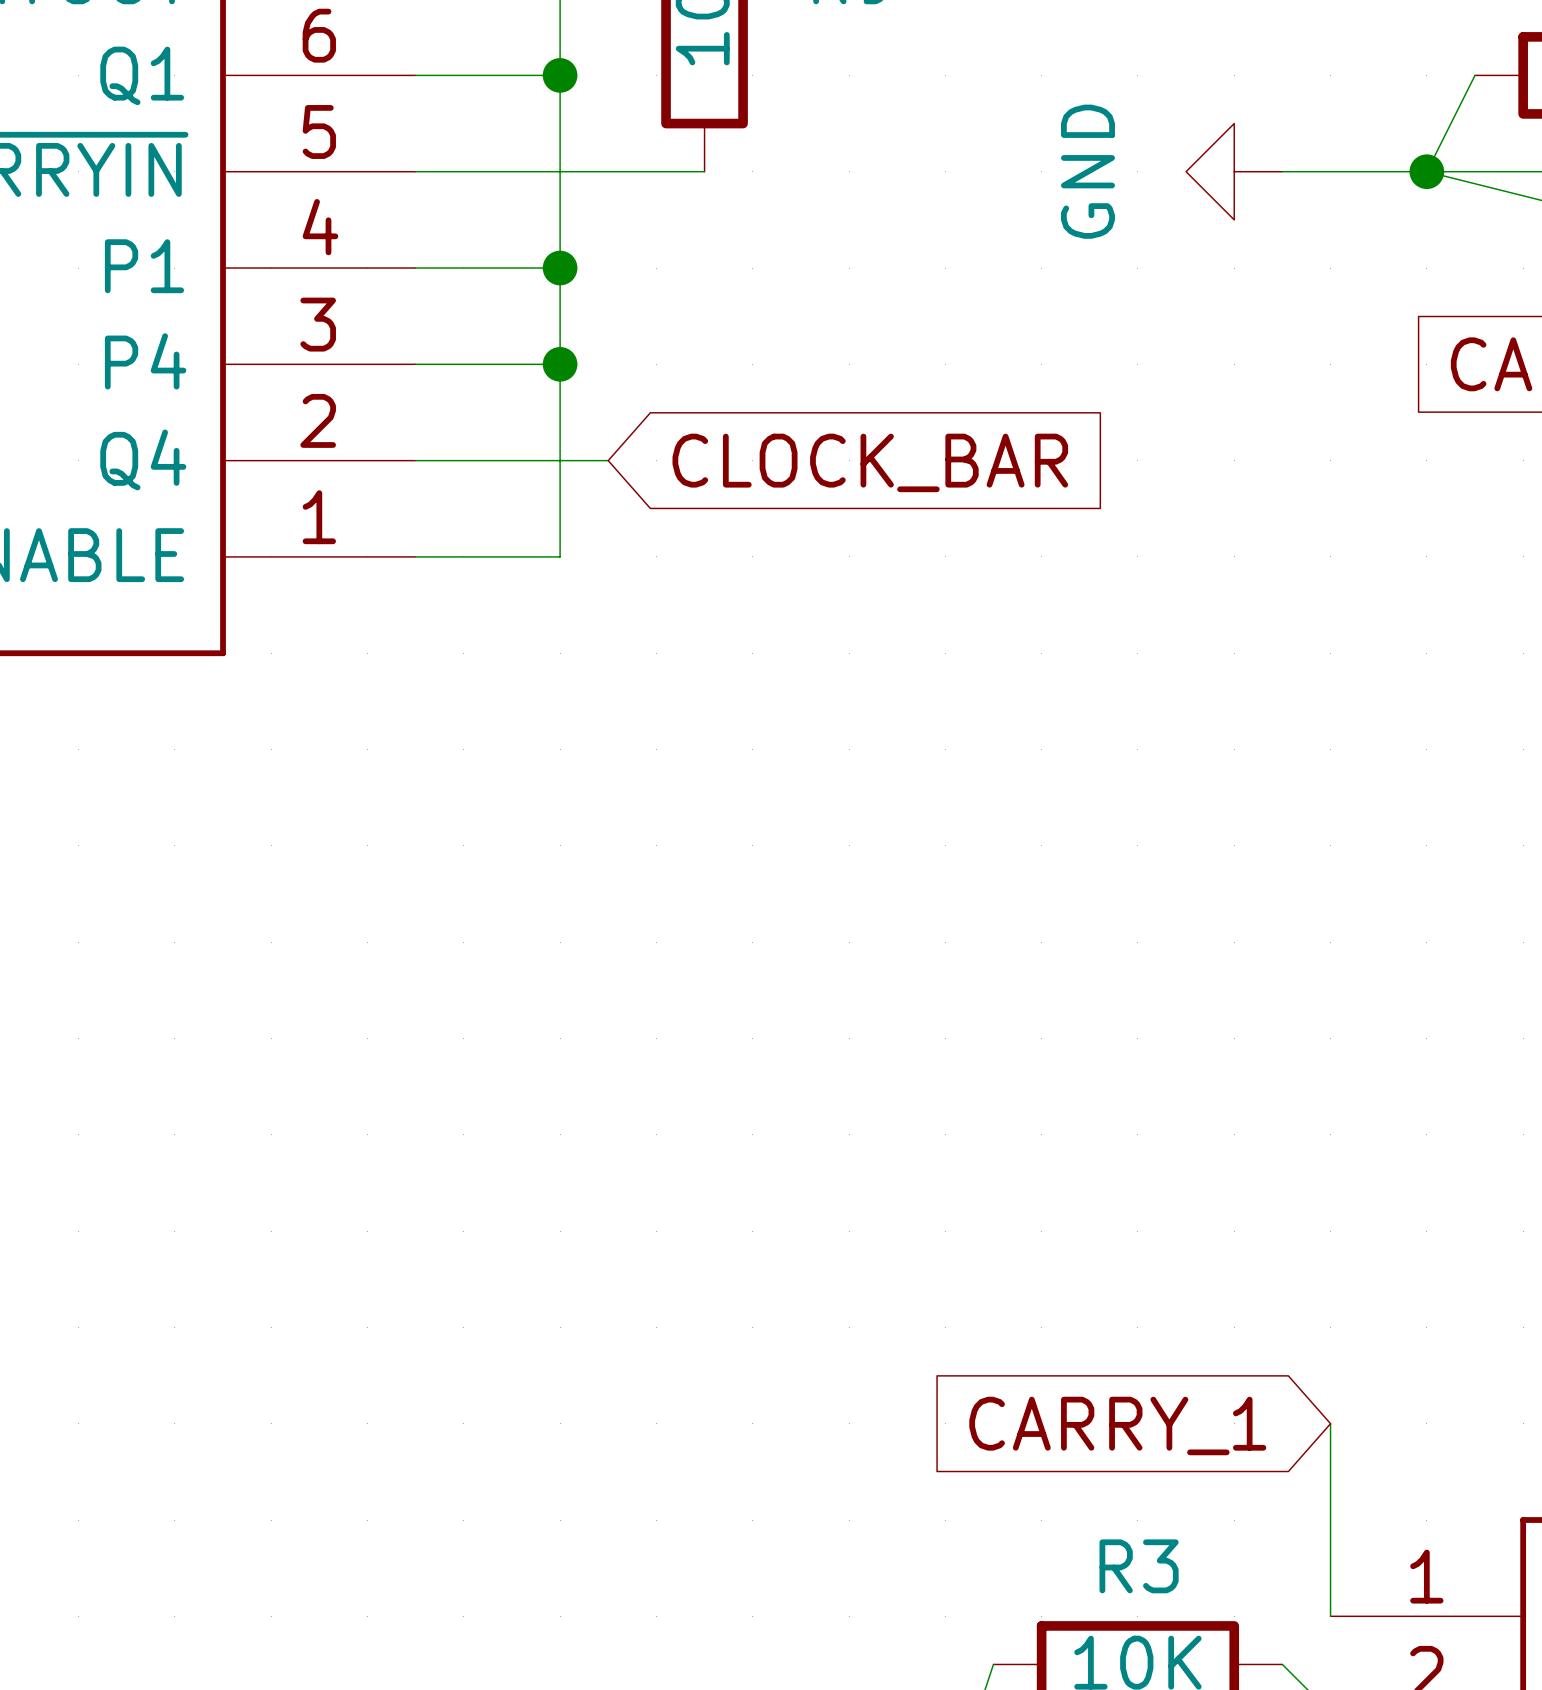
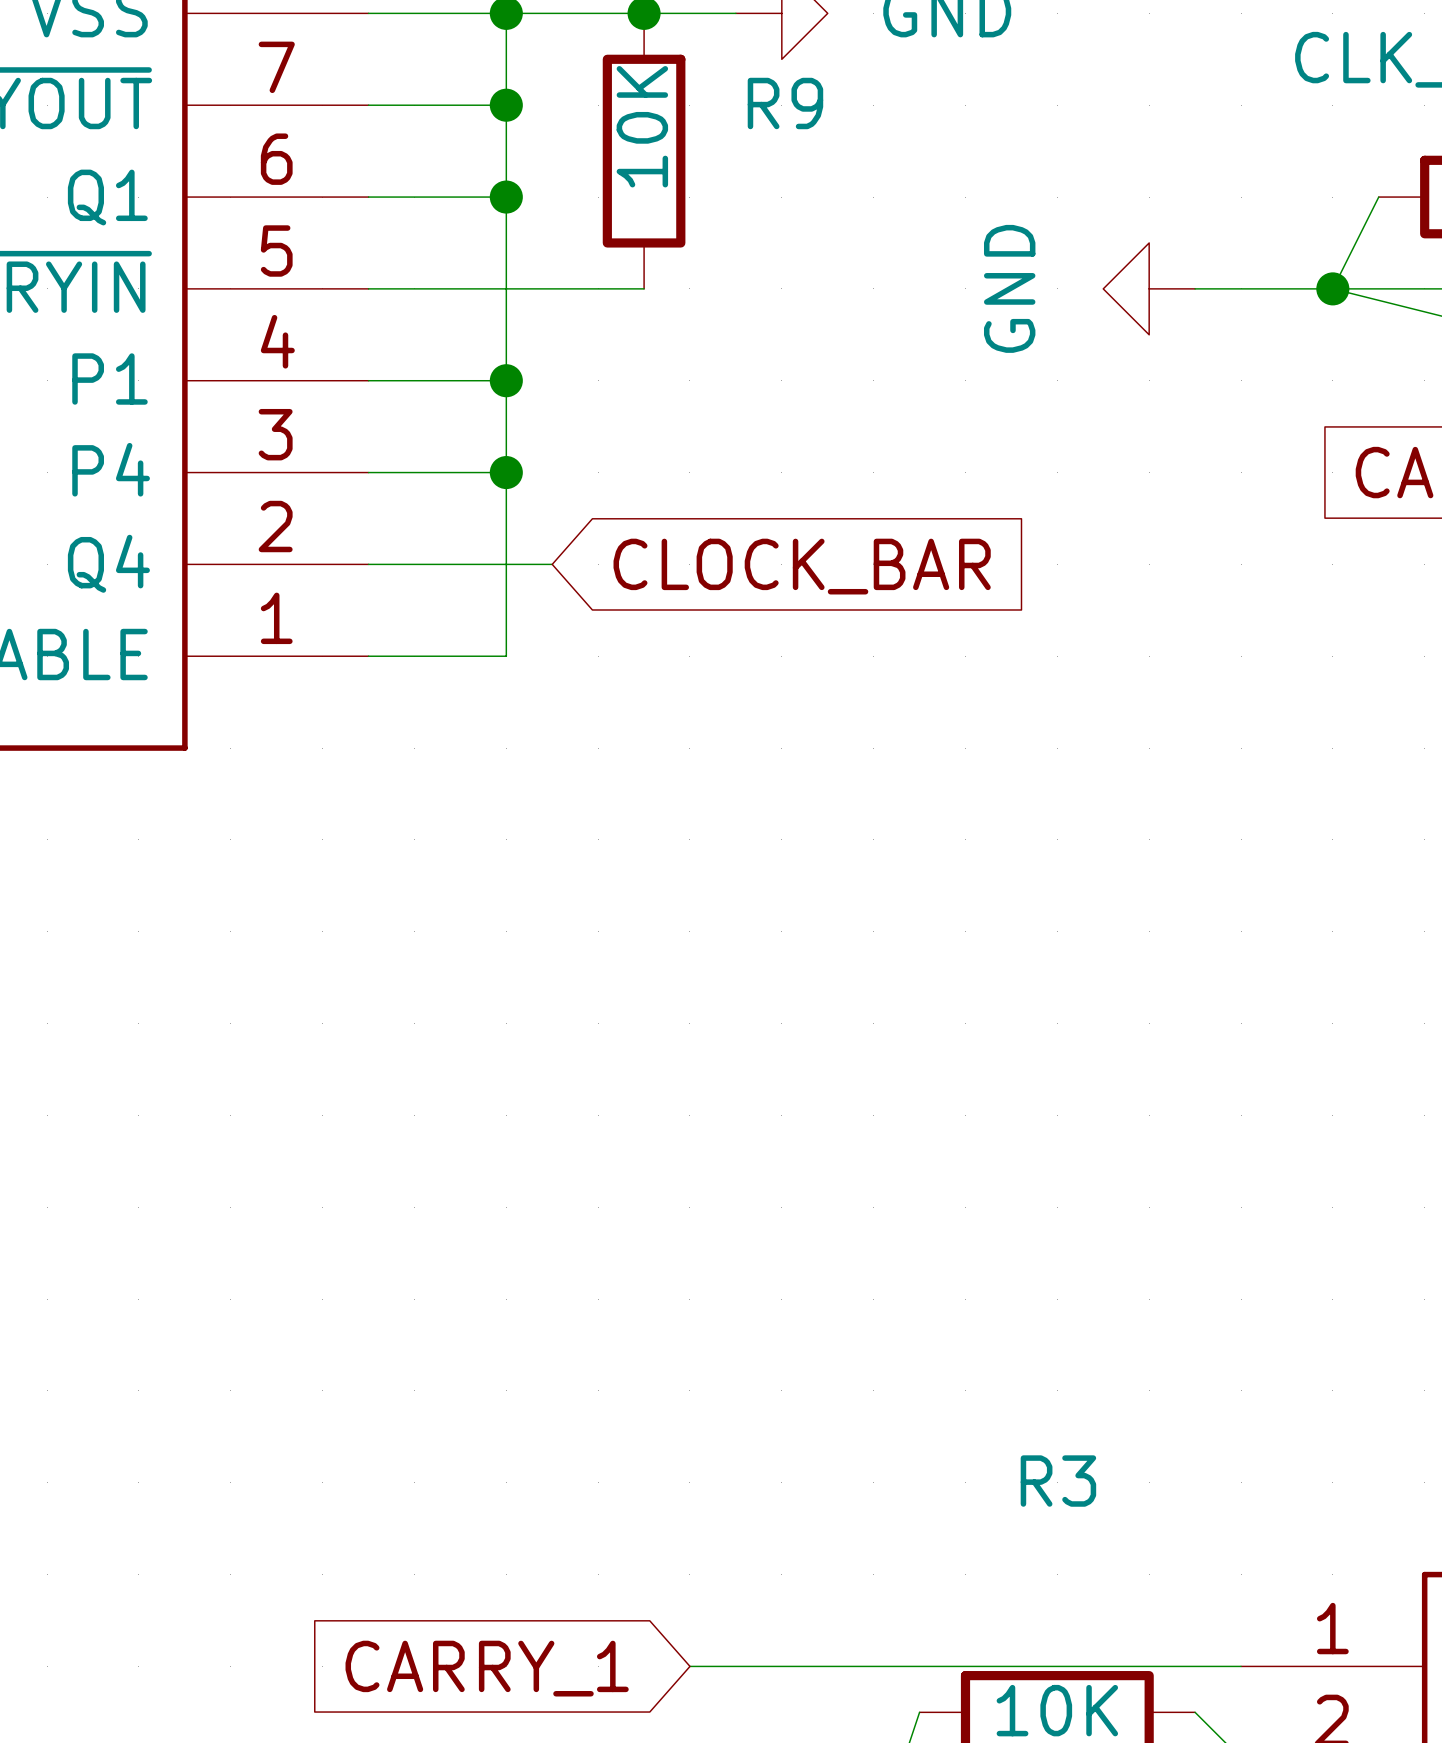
wire: (1330, 1423) (1330, 1616) -> (689, 1666) (1241, 1666)
global label position: CARRY_1 (1117, 1425) -> CARRY_1 (487, 1668)
R3 name position: R3 (1139, 1566) -> R3 (1058, 1481)

